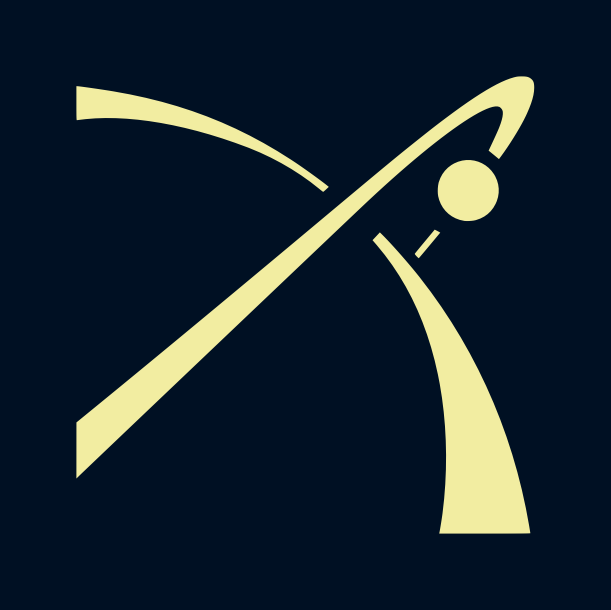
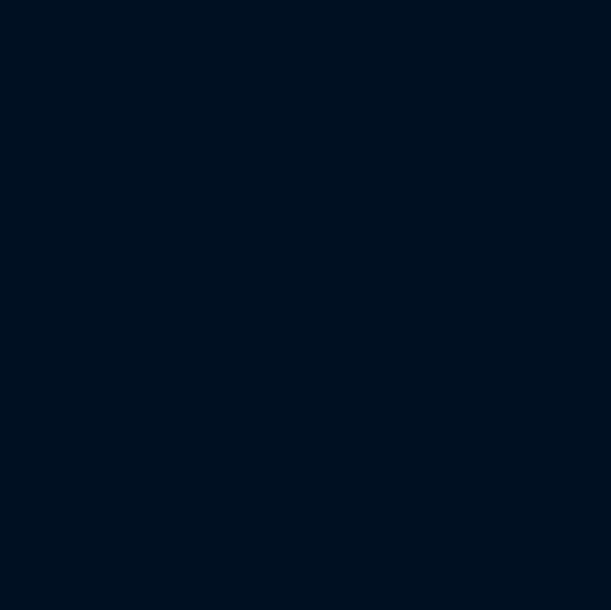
drawing: [76, 76, 535, 534] -> none

